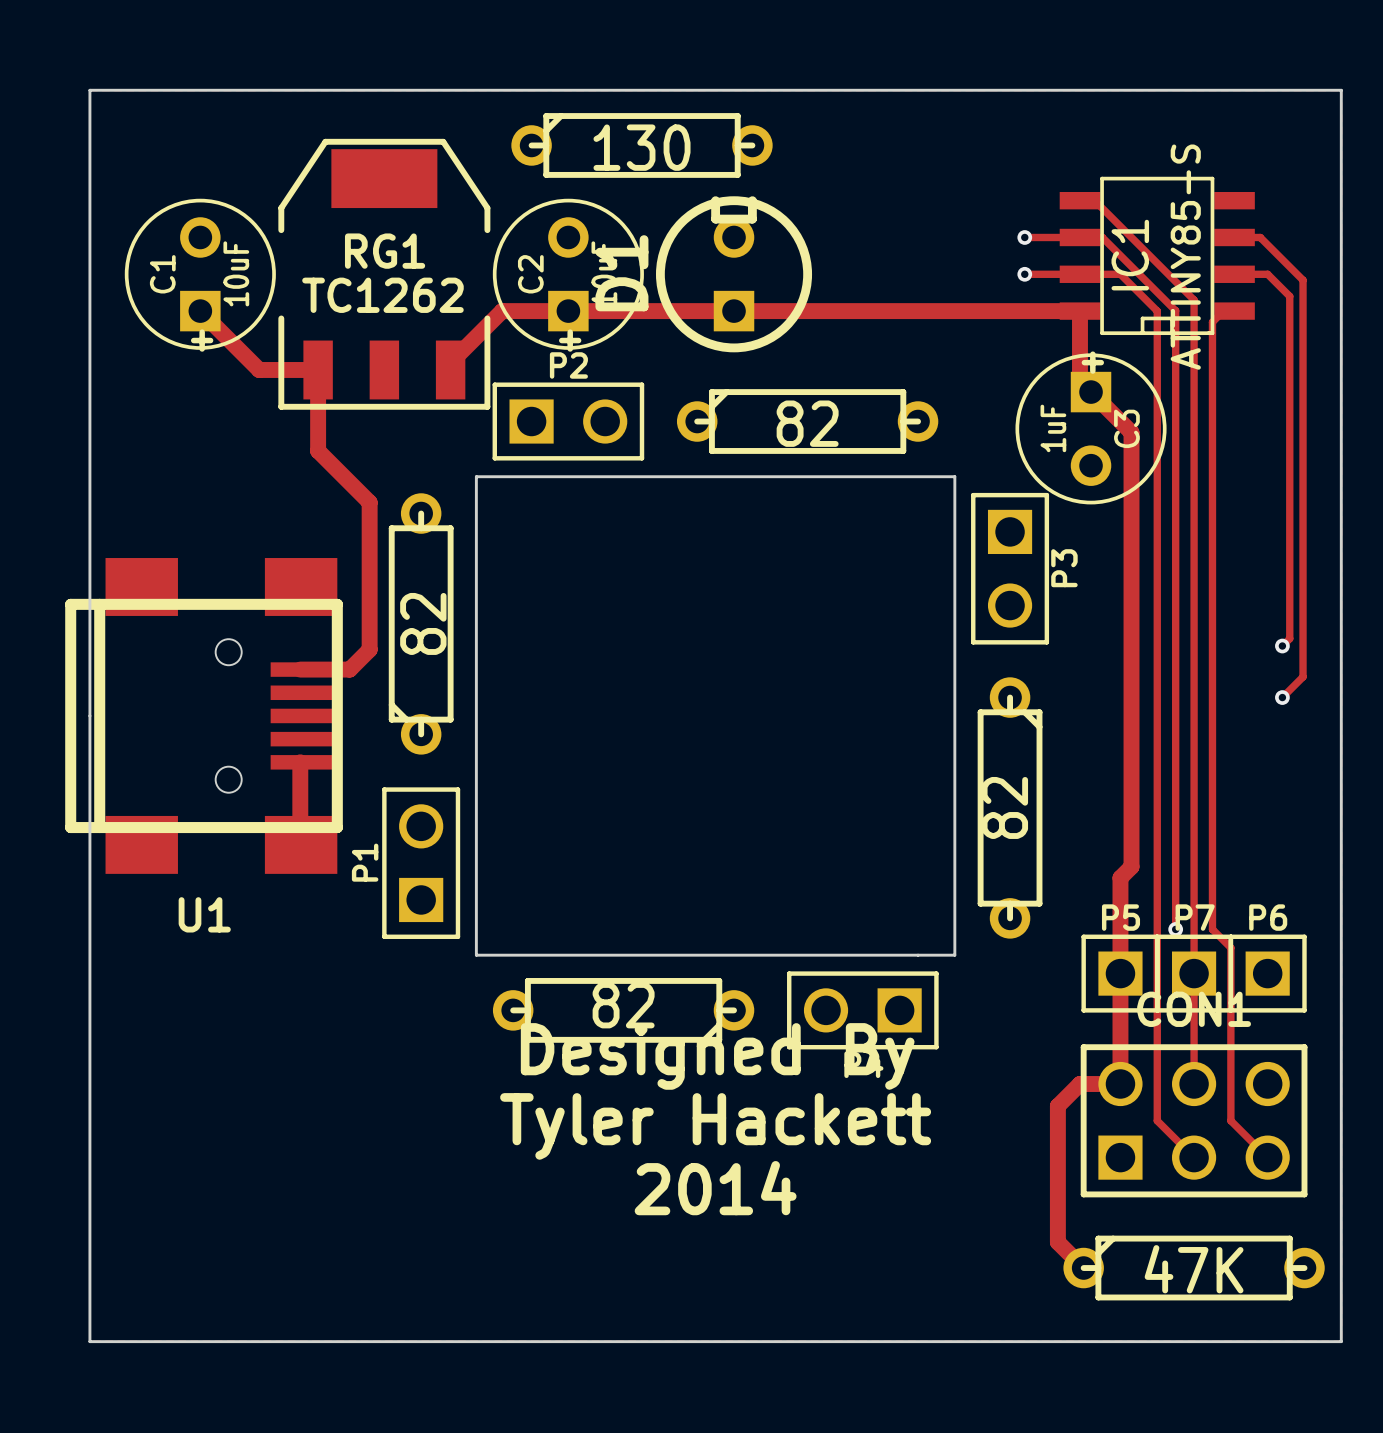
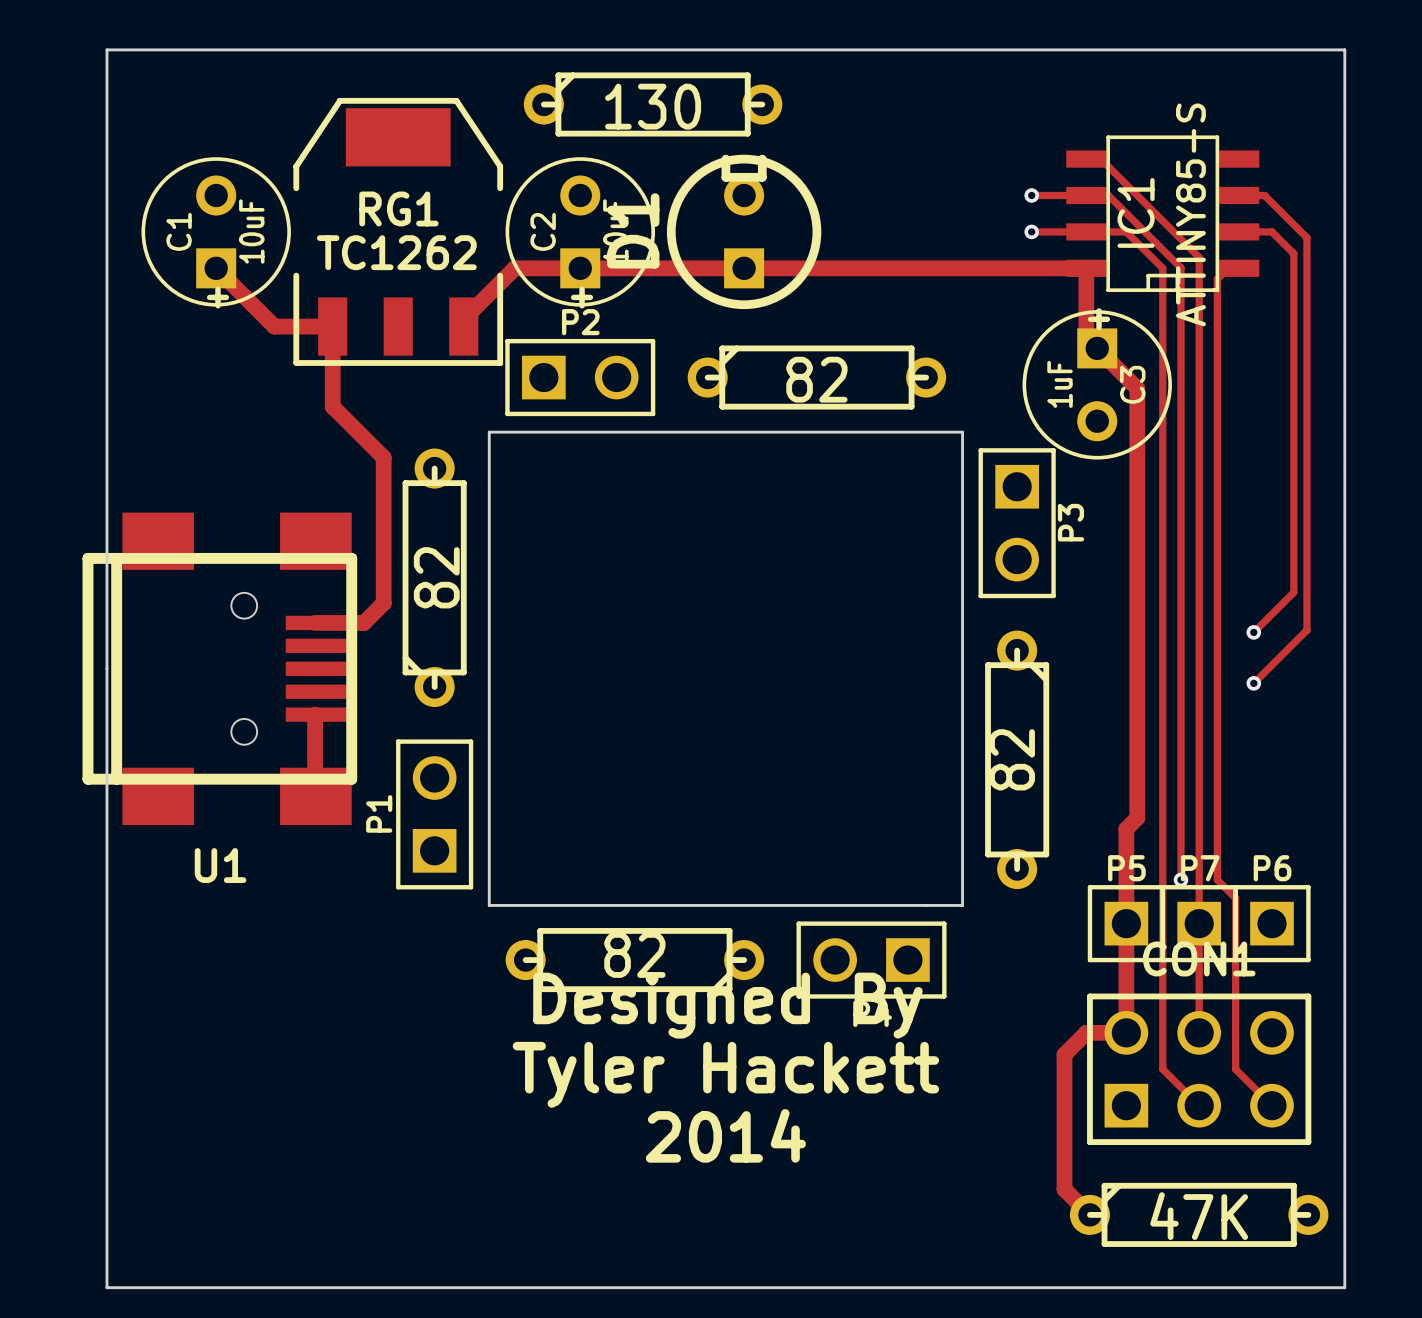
track: none -> (1286, 599) (1253, 632)
via: (1282, 646) -> none
via: none -> (1253, 632)
track: none -> (1286, 650) (1253, 683)
via: (1282, 697) -> none
via: none -> (1253, 683)

